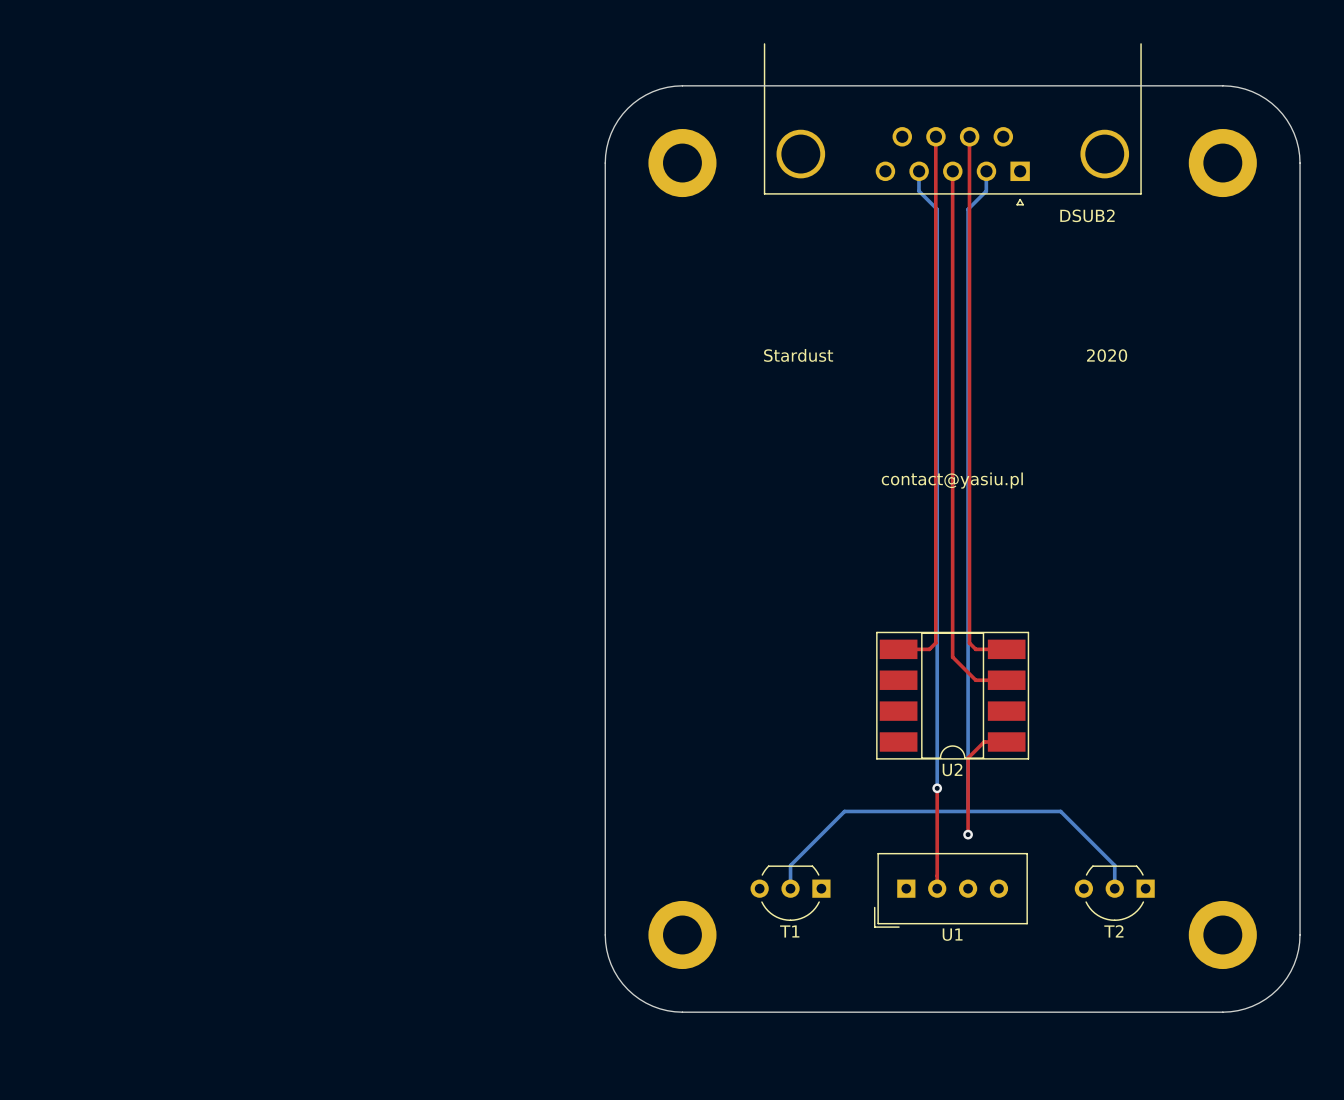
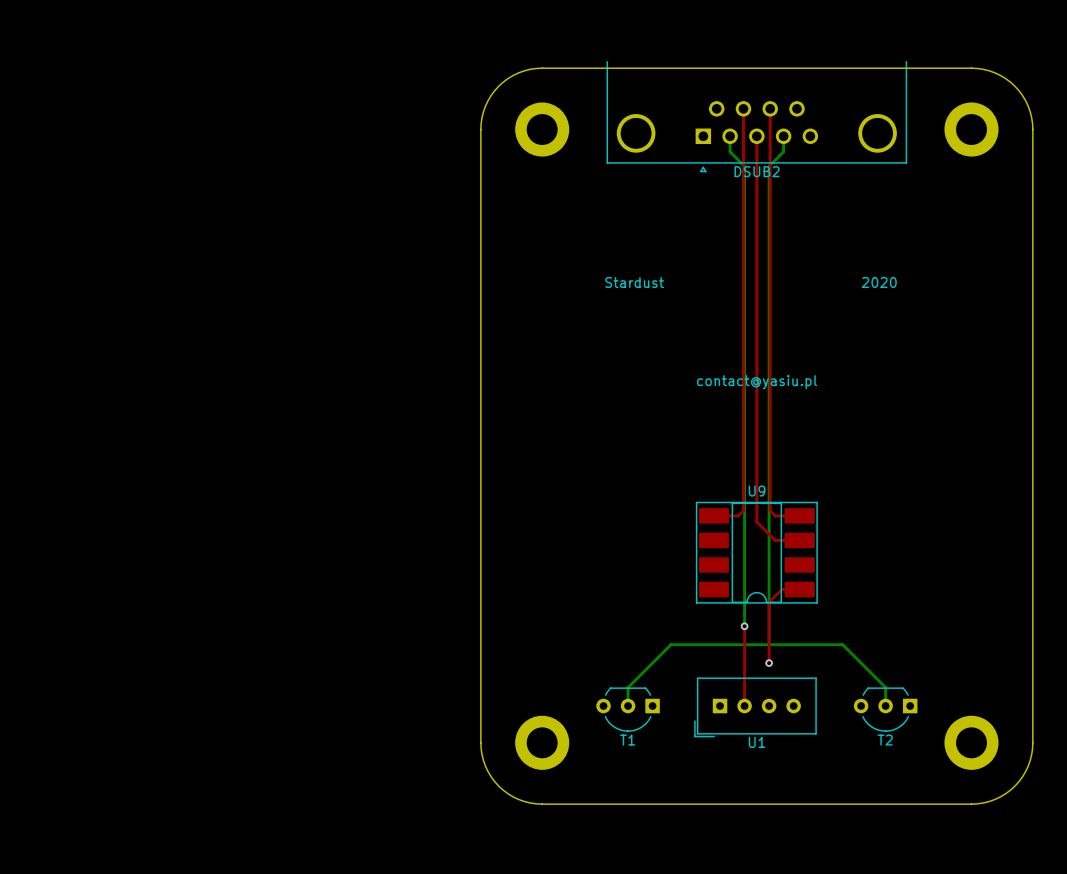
DSUB2 footprint: [763, 43, 1142, 206] -> [606, 61, 907, 173]
DSUB2 name position: DSUB2 (1087, 215) -> DSUB2 (757, 171)
U2 name: U2 (952, 769) -> U9 (757, 491)

